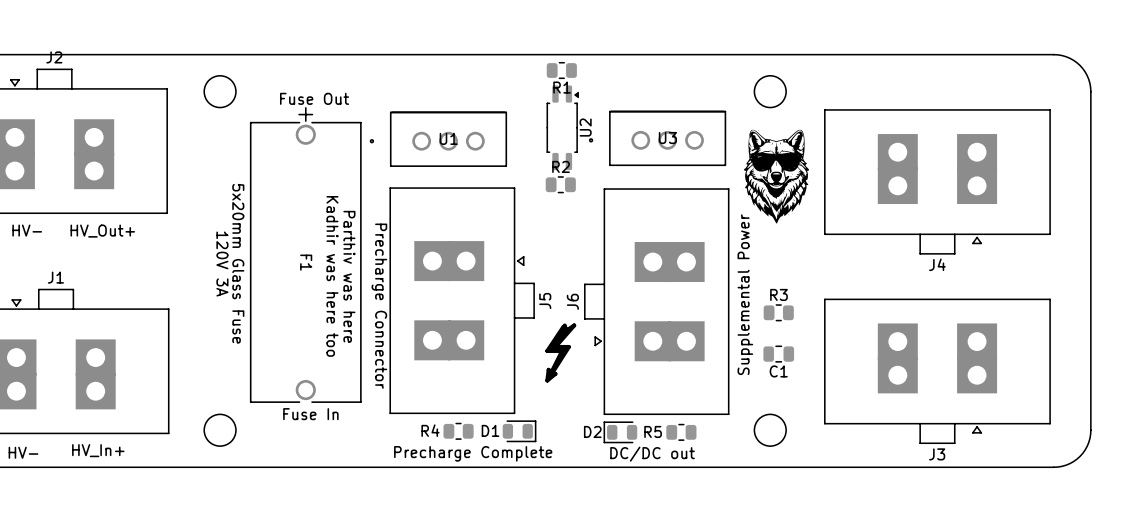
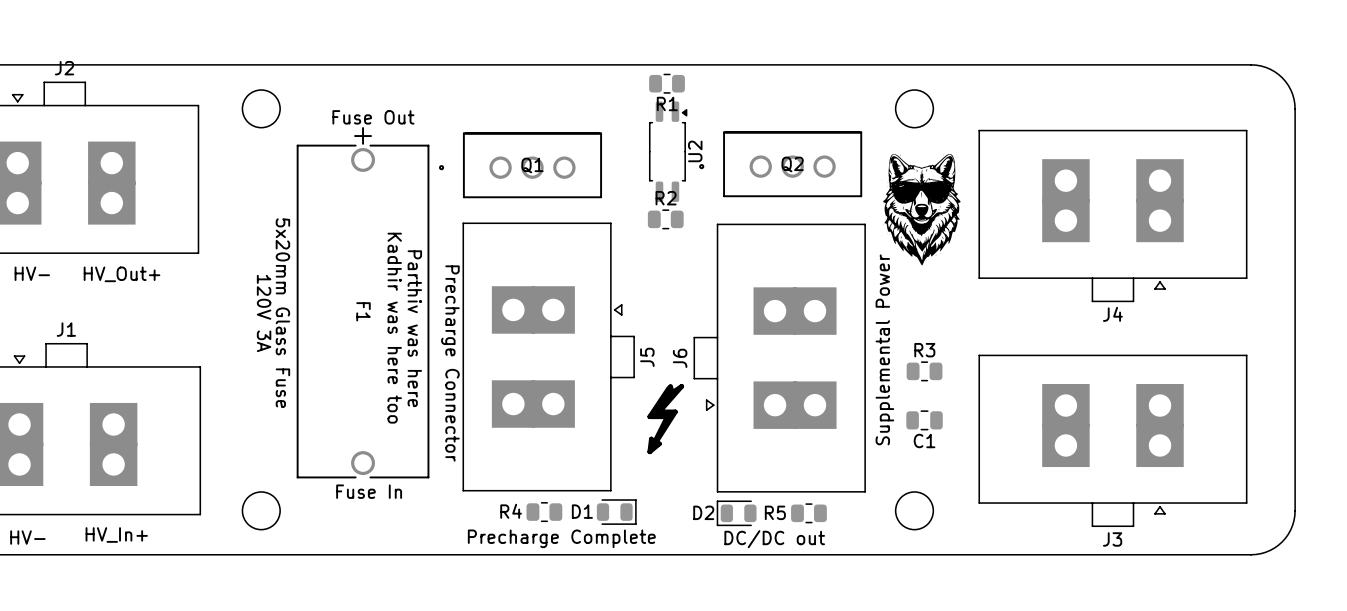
U1 name: U1 (448, 138) -> Q1 (532, 165)
U3 name: U3 (667, 138) -> Q2 (792, 164)

